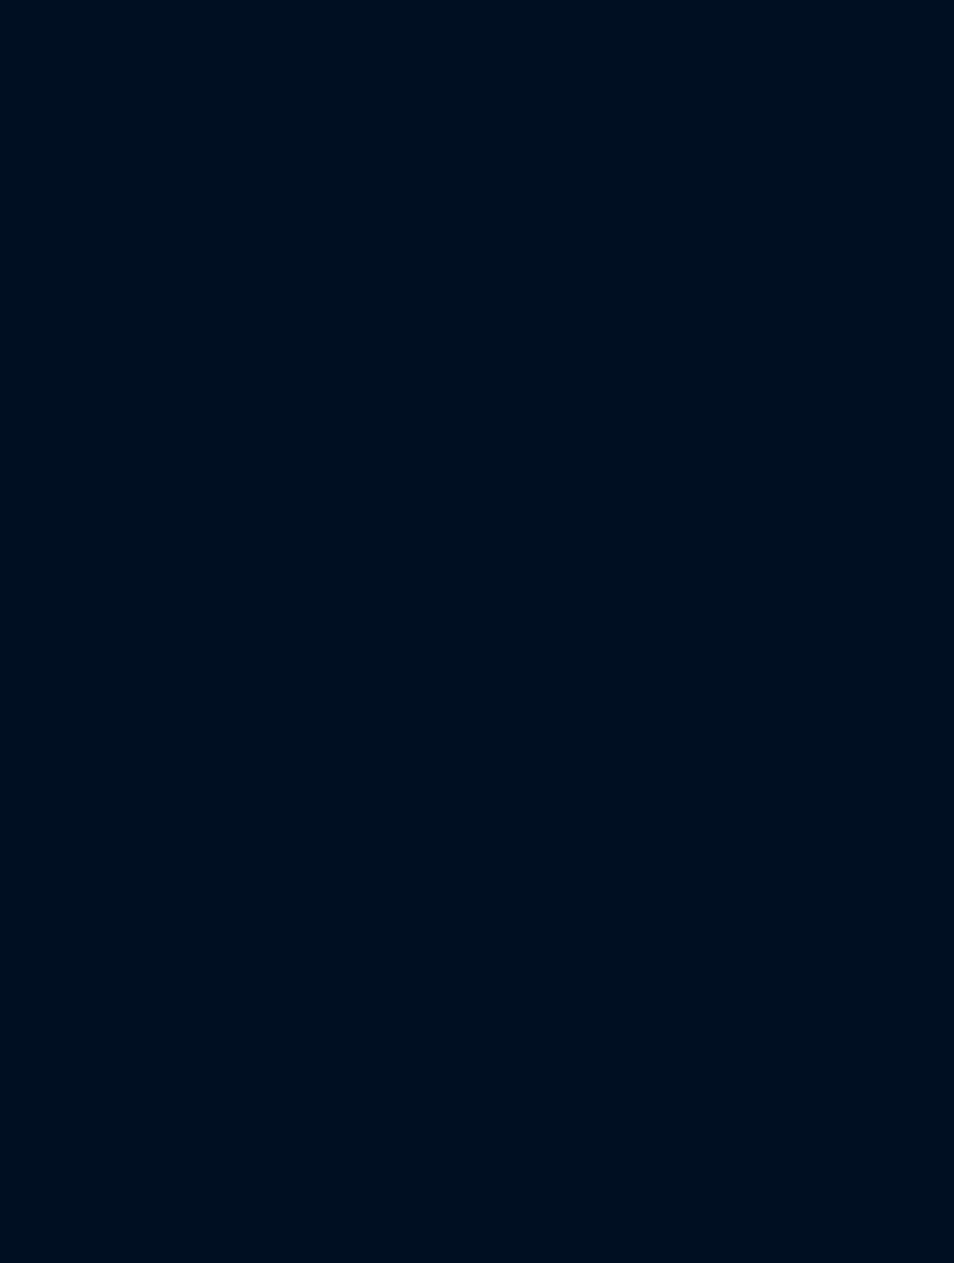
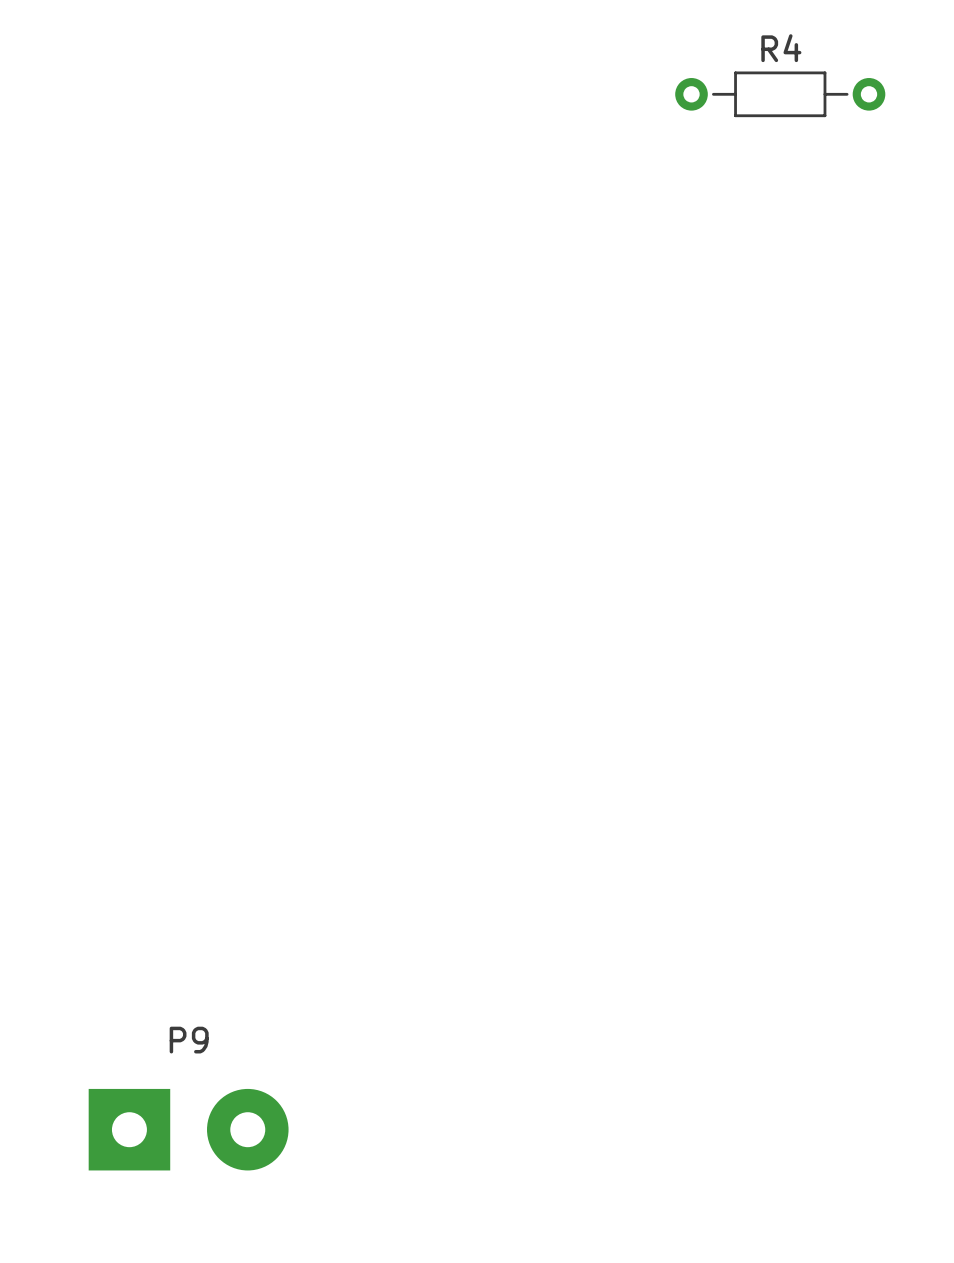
R4: none -> (780, 94)
P9: none -> (188, 1129)

